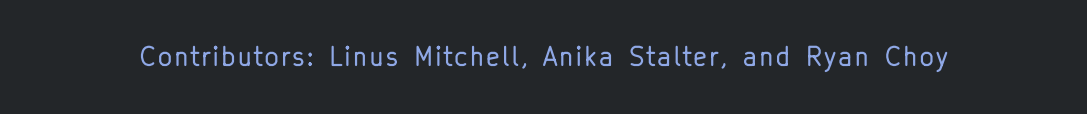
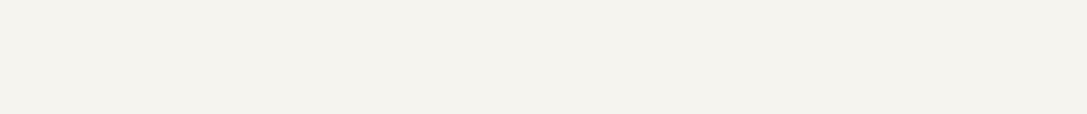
text: Contributors: Linus Mitchell, Anika Stalter, and Ryan Choy (544, 58) -> none

